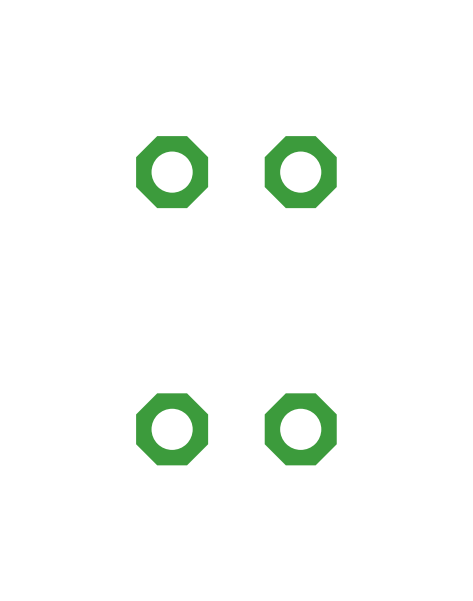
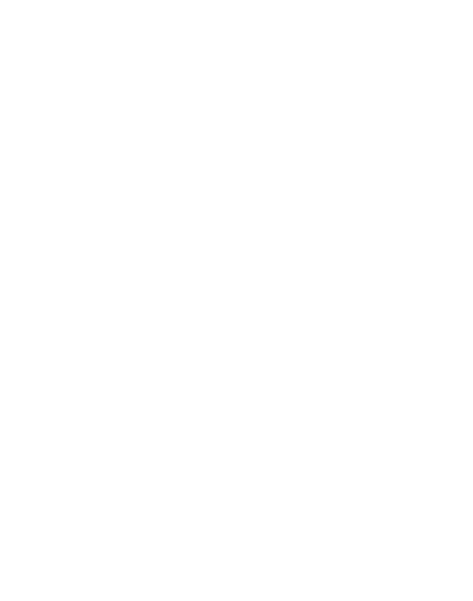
part: (236, 172) -> none
part: (236, 429) -> none

